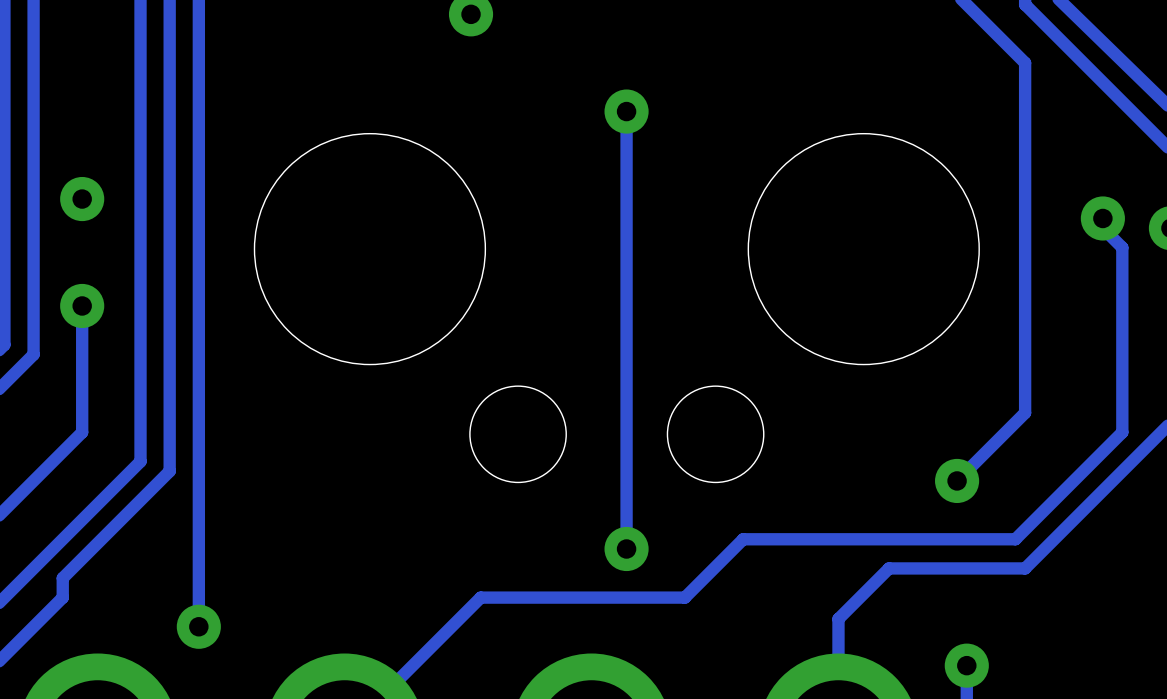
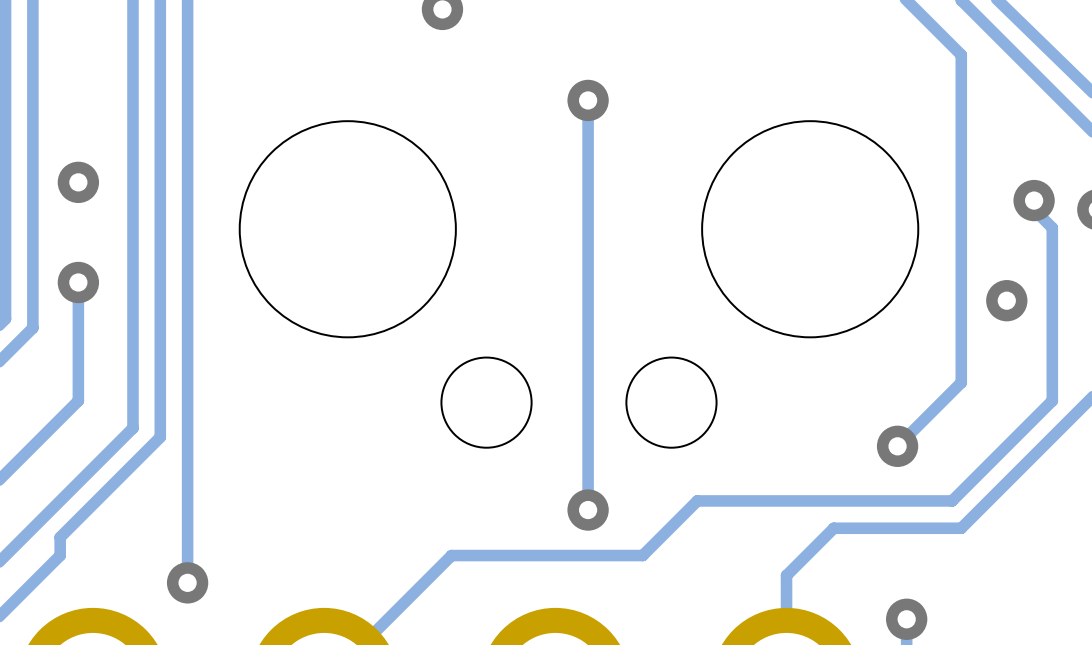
via: none -> (1006, 300)

